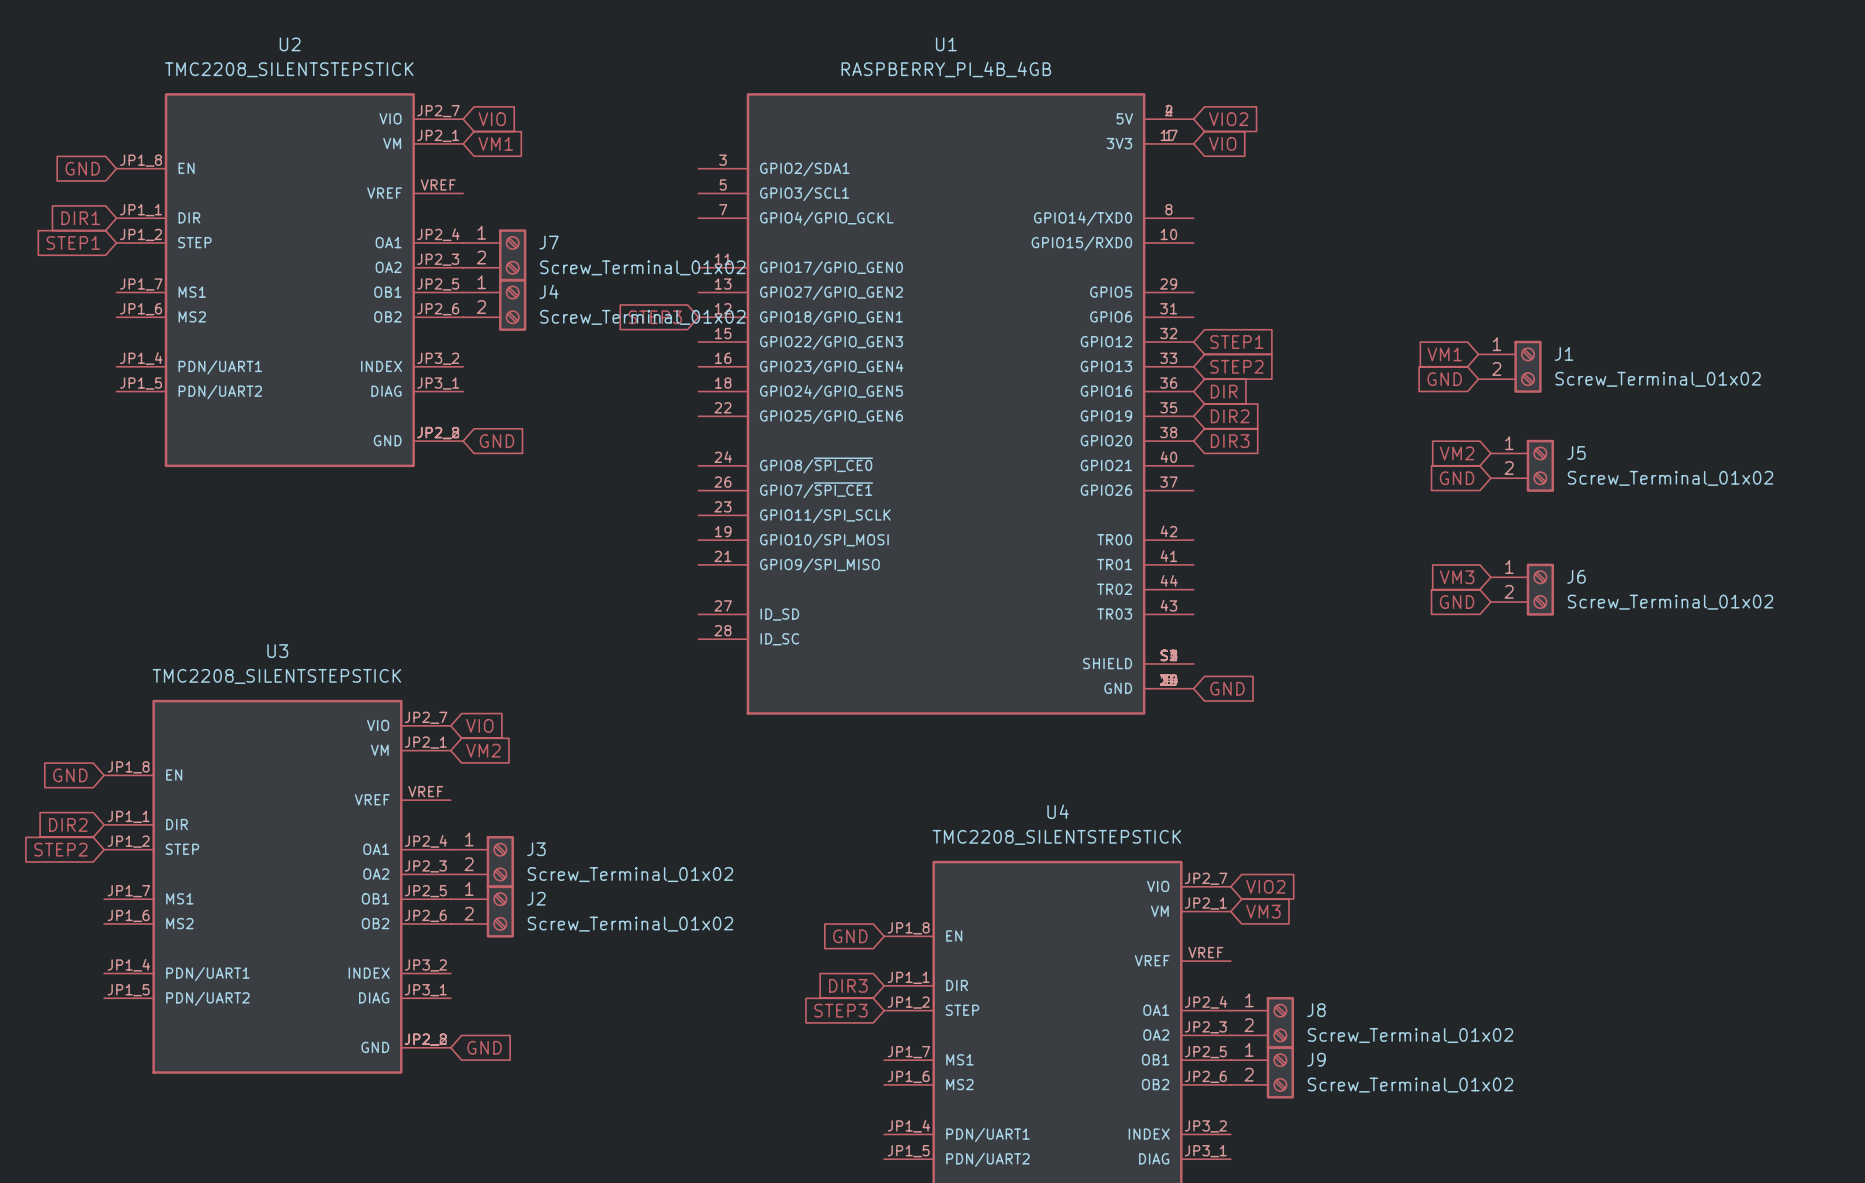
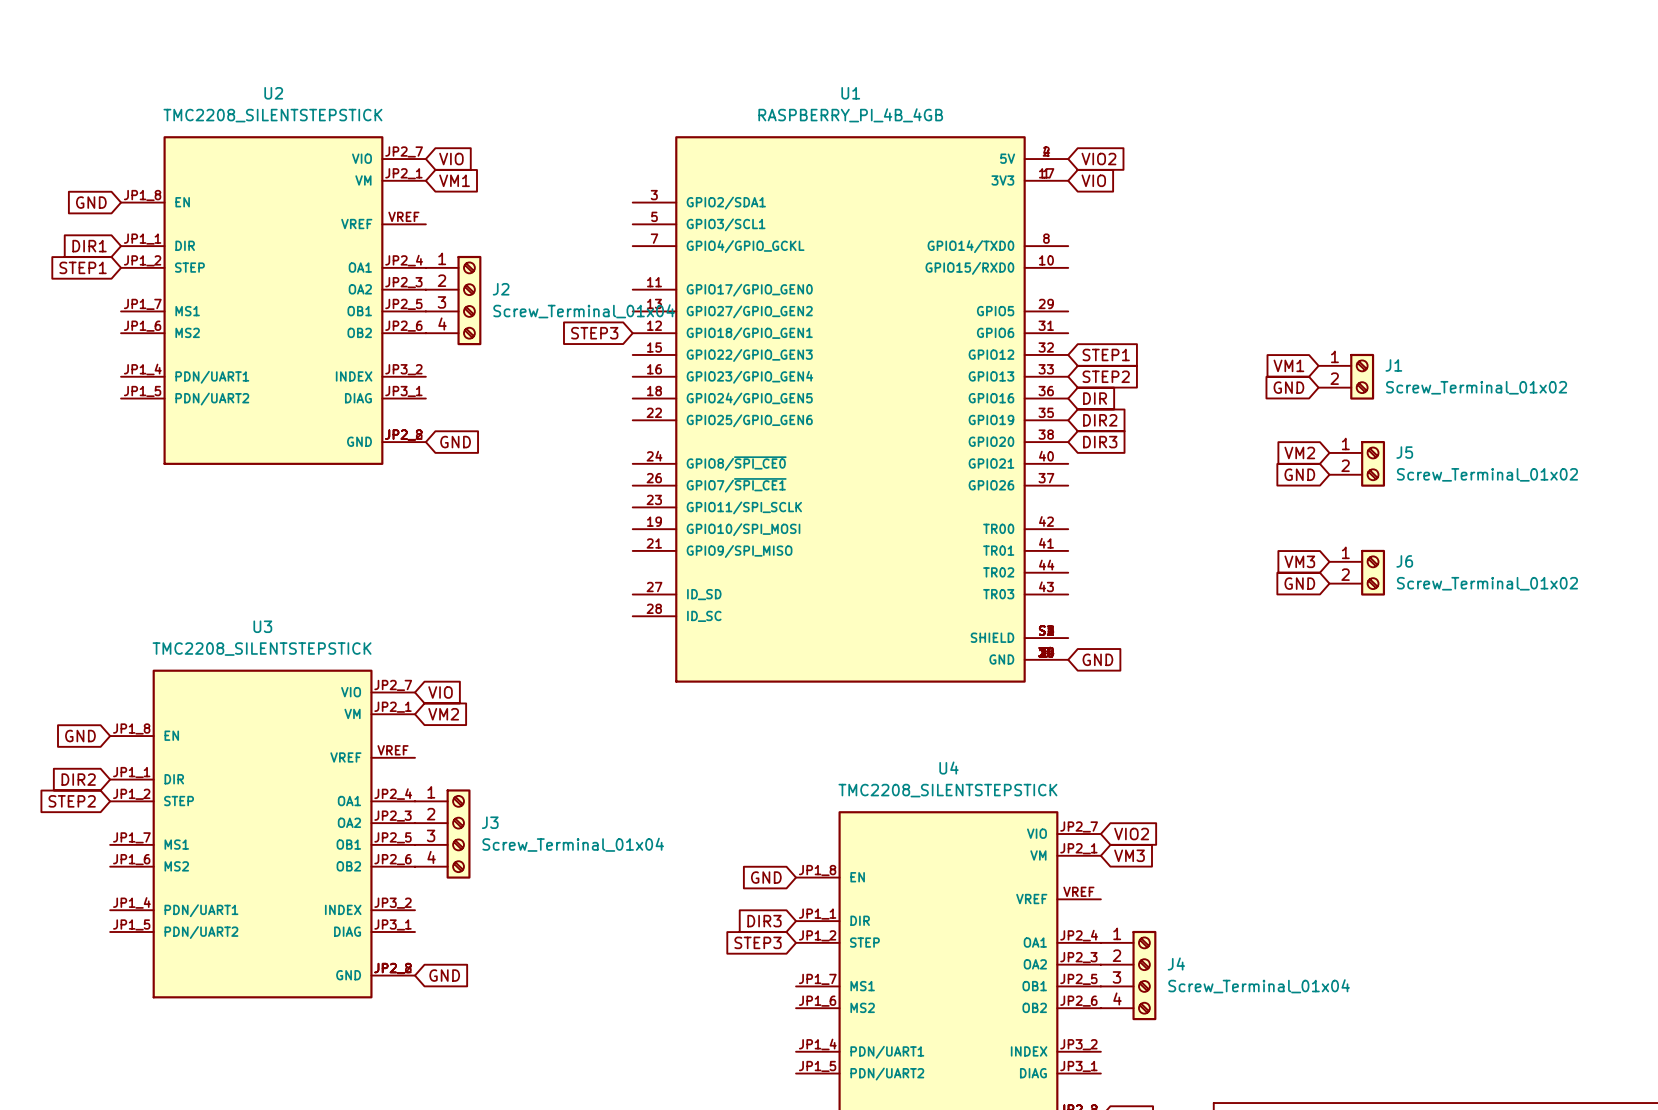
J7: Screw_Terminal_01x02 (494, 255) -> none
J4 symbol: [463, 278, 527, 331] -> [1100, 930, 1157, 1021]
J4 value: Screw_Terminal_01x02 (642, 317) -> Screw_Terminal_01x04 (1259, 986)
J3 symbol: [450, 836, 514, 889] -> [414, 789, 471, 879]
J3 value: Screw_Terminal_01x02 (630, 874) -> Screw_Terminal_01x04 (573, 844)
J2 symbol: [450, 885, 514, 938] -> [425, 255, 482, 346]
J2 value: Screw_Terminal_01x02 (630, 924) -> Screw_Terminal_01x04 (584, 311)
J8: Screw_Terminal_01x02 (1262, 1023) -> none
J9: Screw_Terminal_01x02 (1262, 1072) -> none

